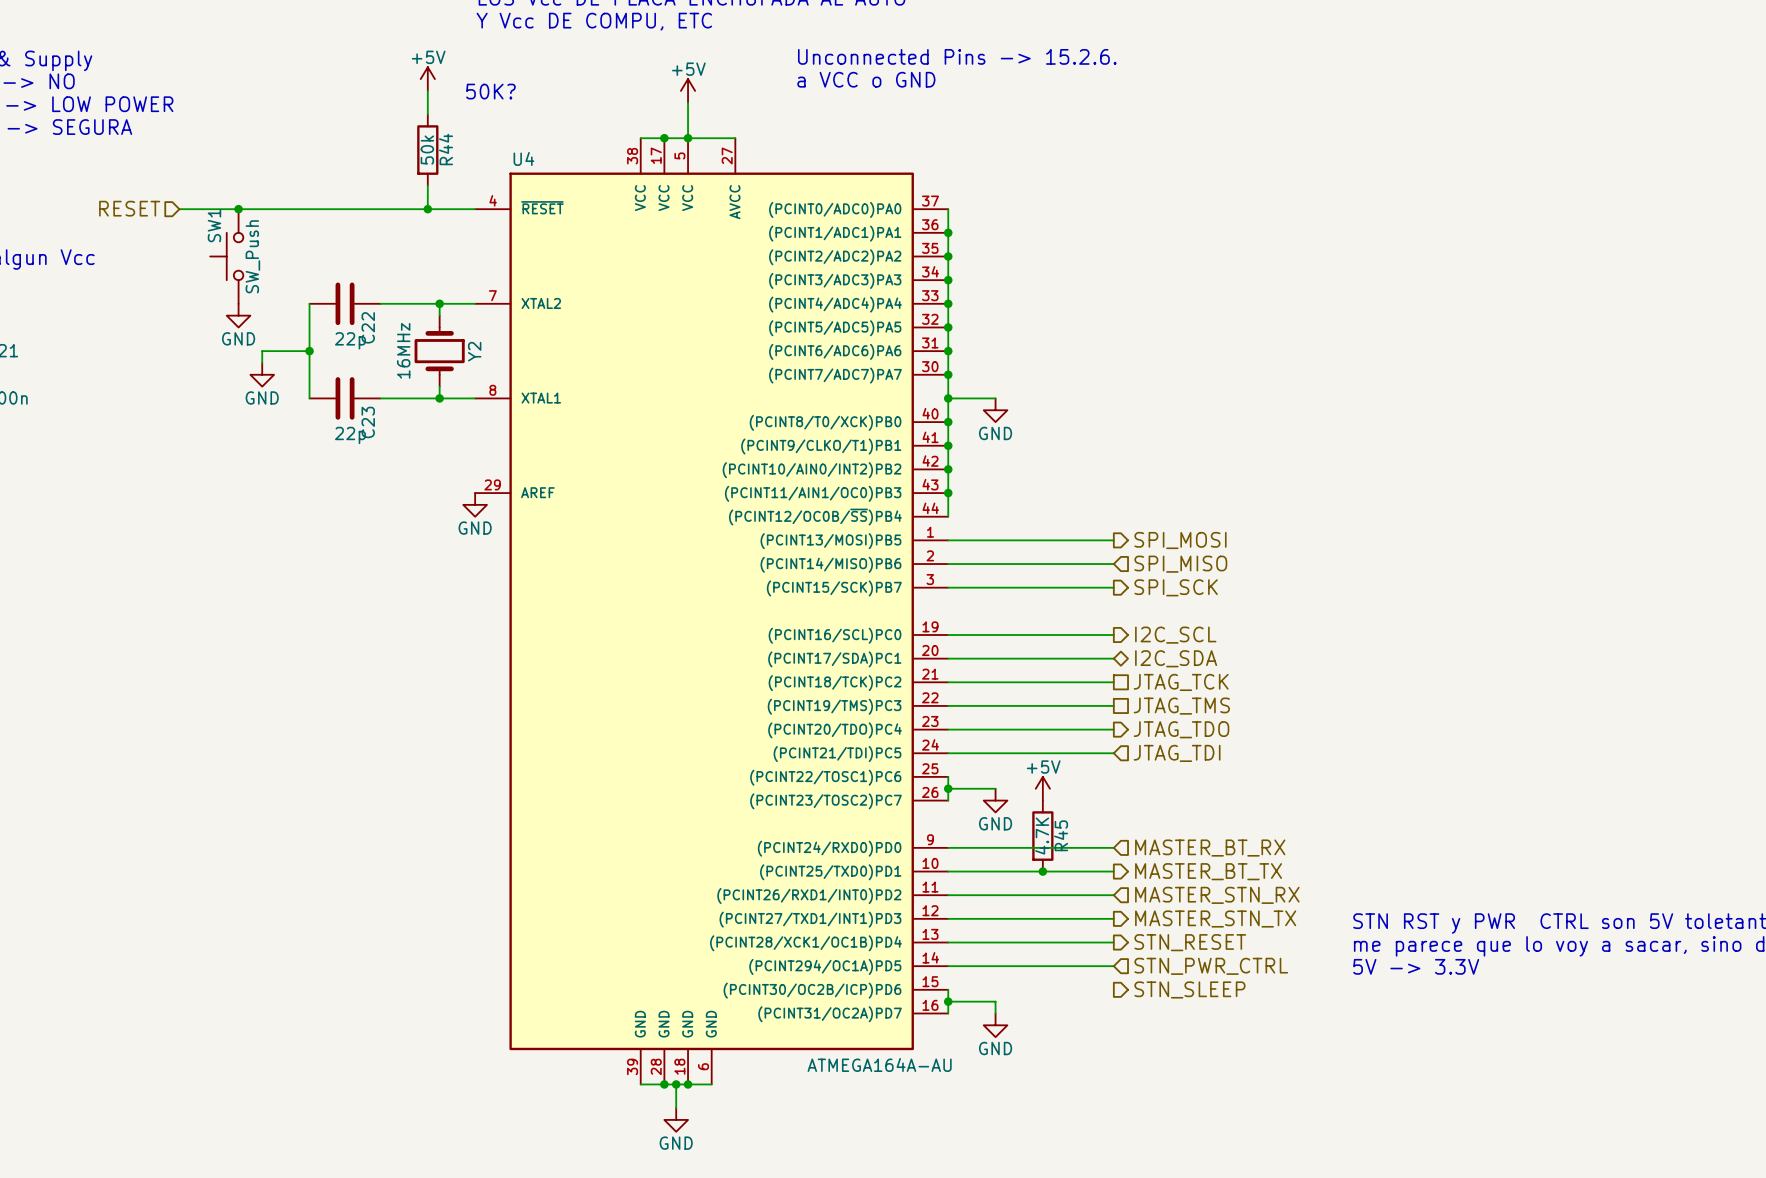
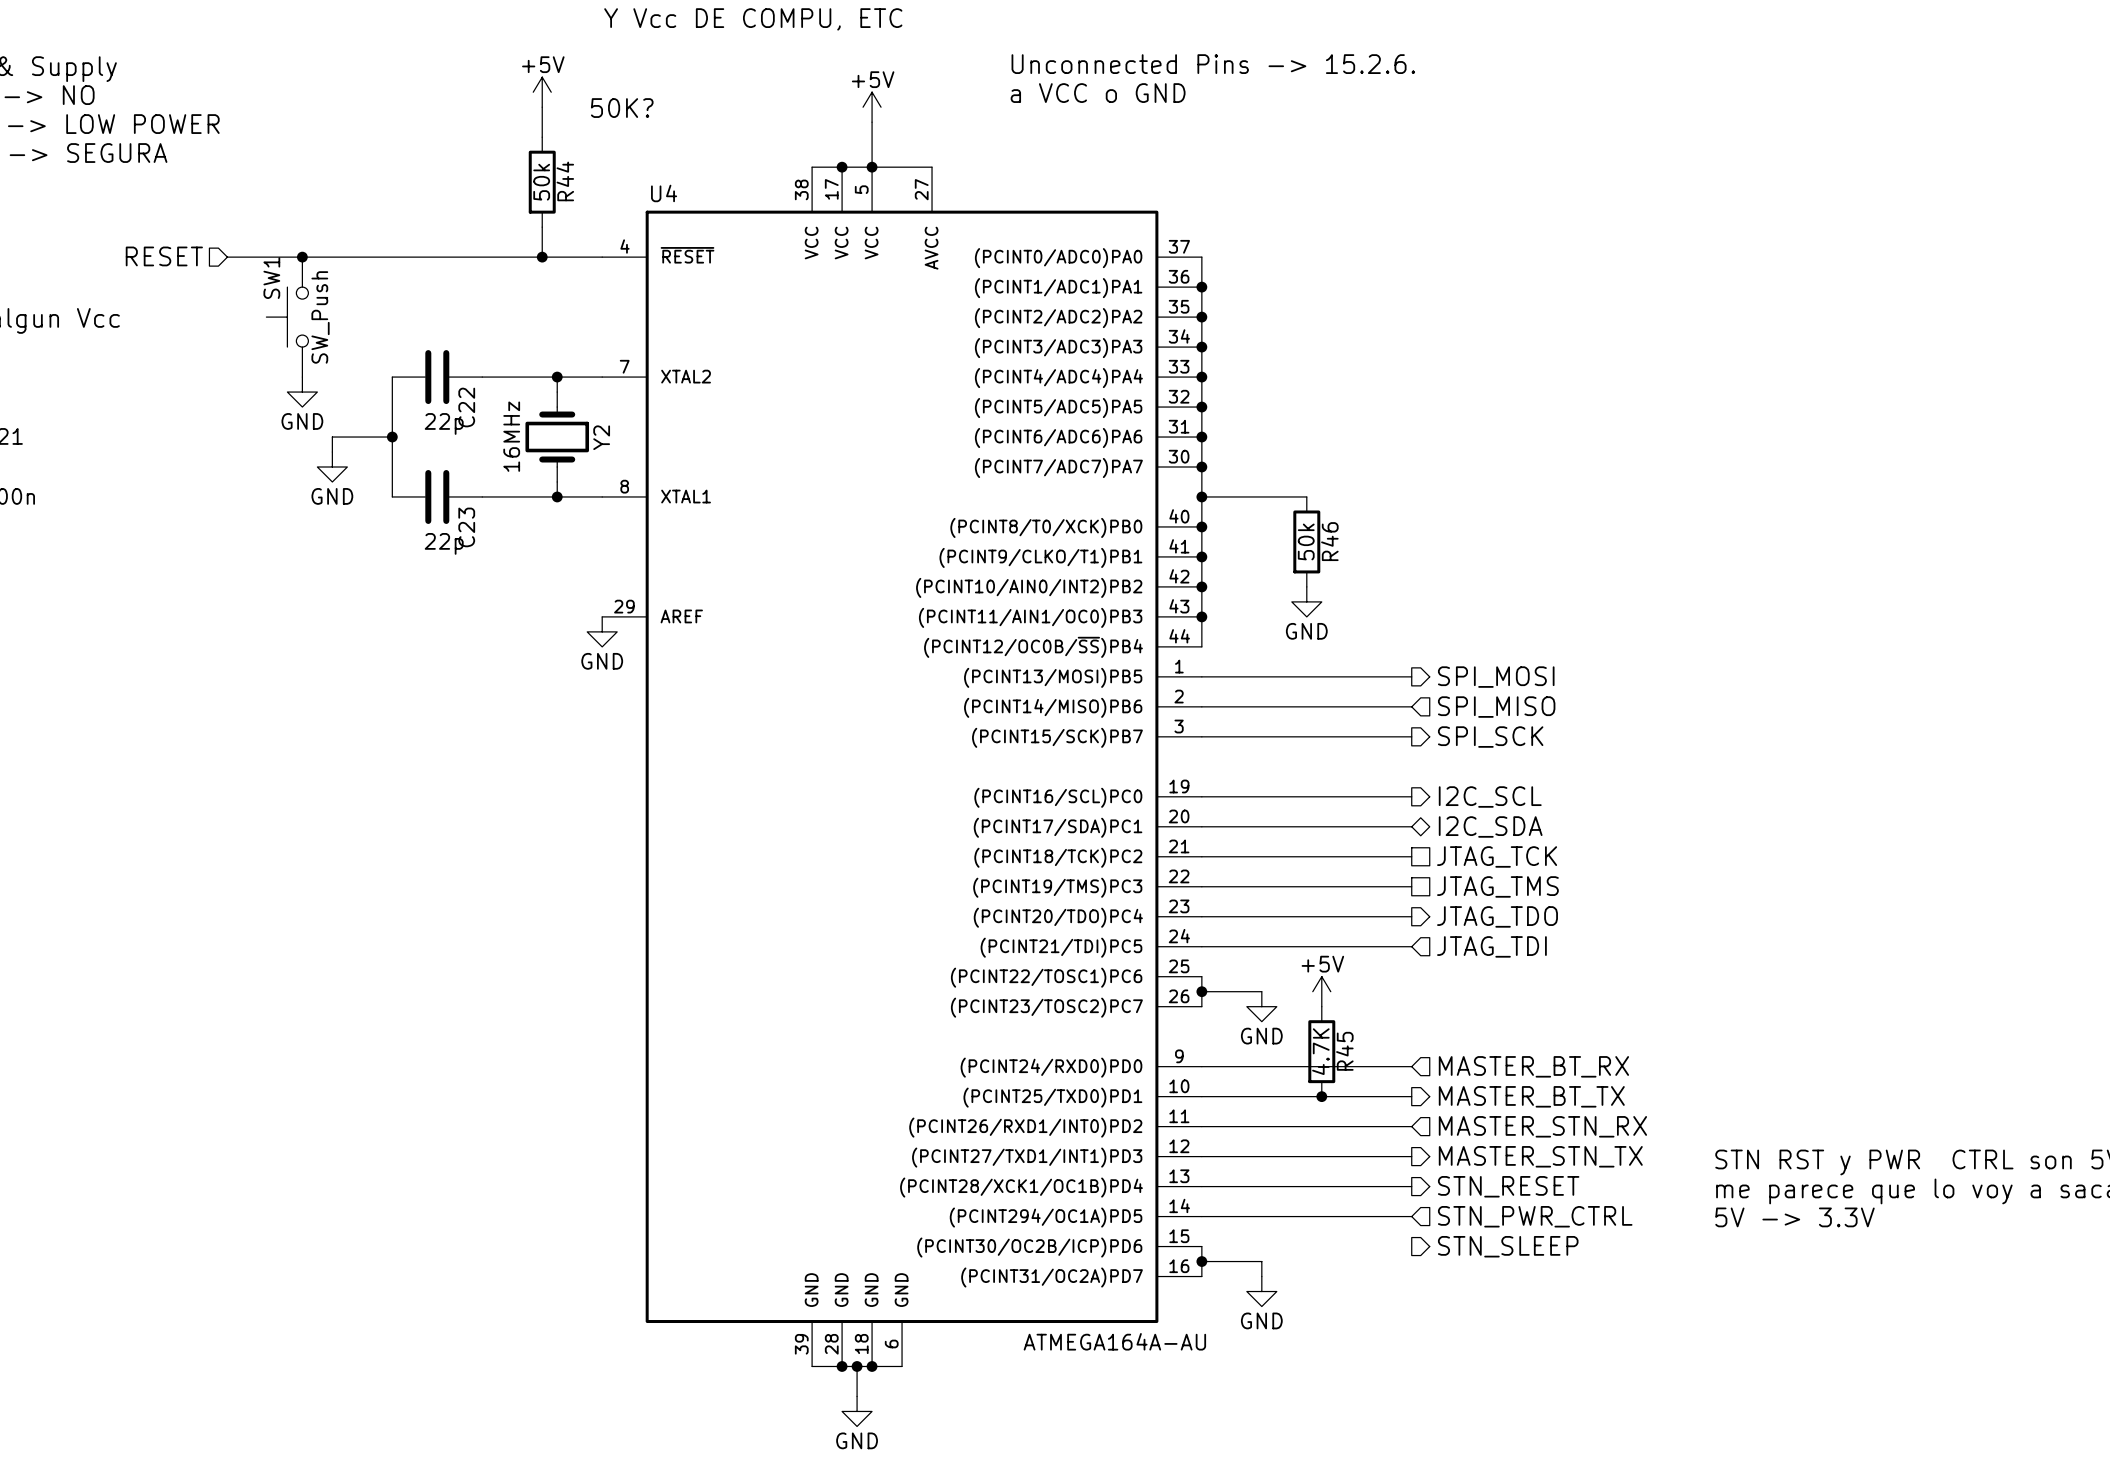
wire: none -> (1261, 496) (1306, 496)
power symbol position: GND (995, 410) -> GND (1306, 601)
R46: none -> 50k (1306, 541)

